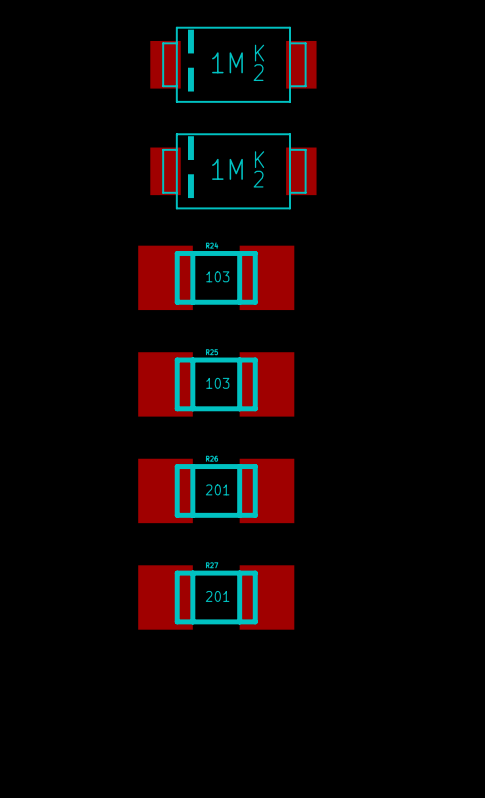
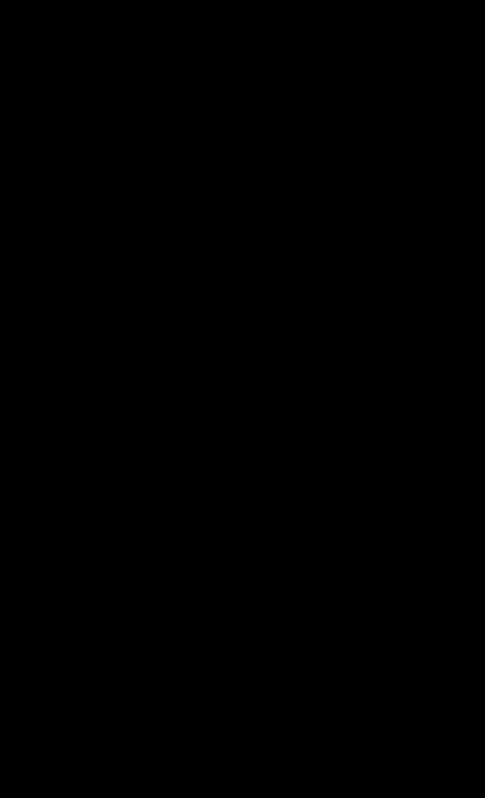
part: (233, 64) -> none
part: (233, 171) -> none
part: (216, 277) -> none
part: (216, 384) -> none
part: (216, 490) -> none
part: (216, 597) -> none

